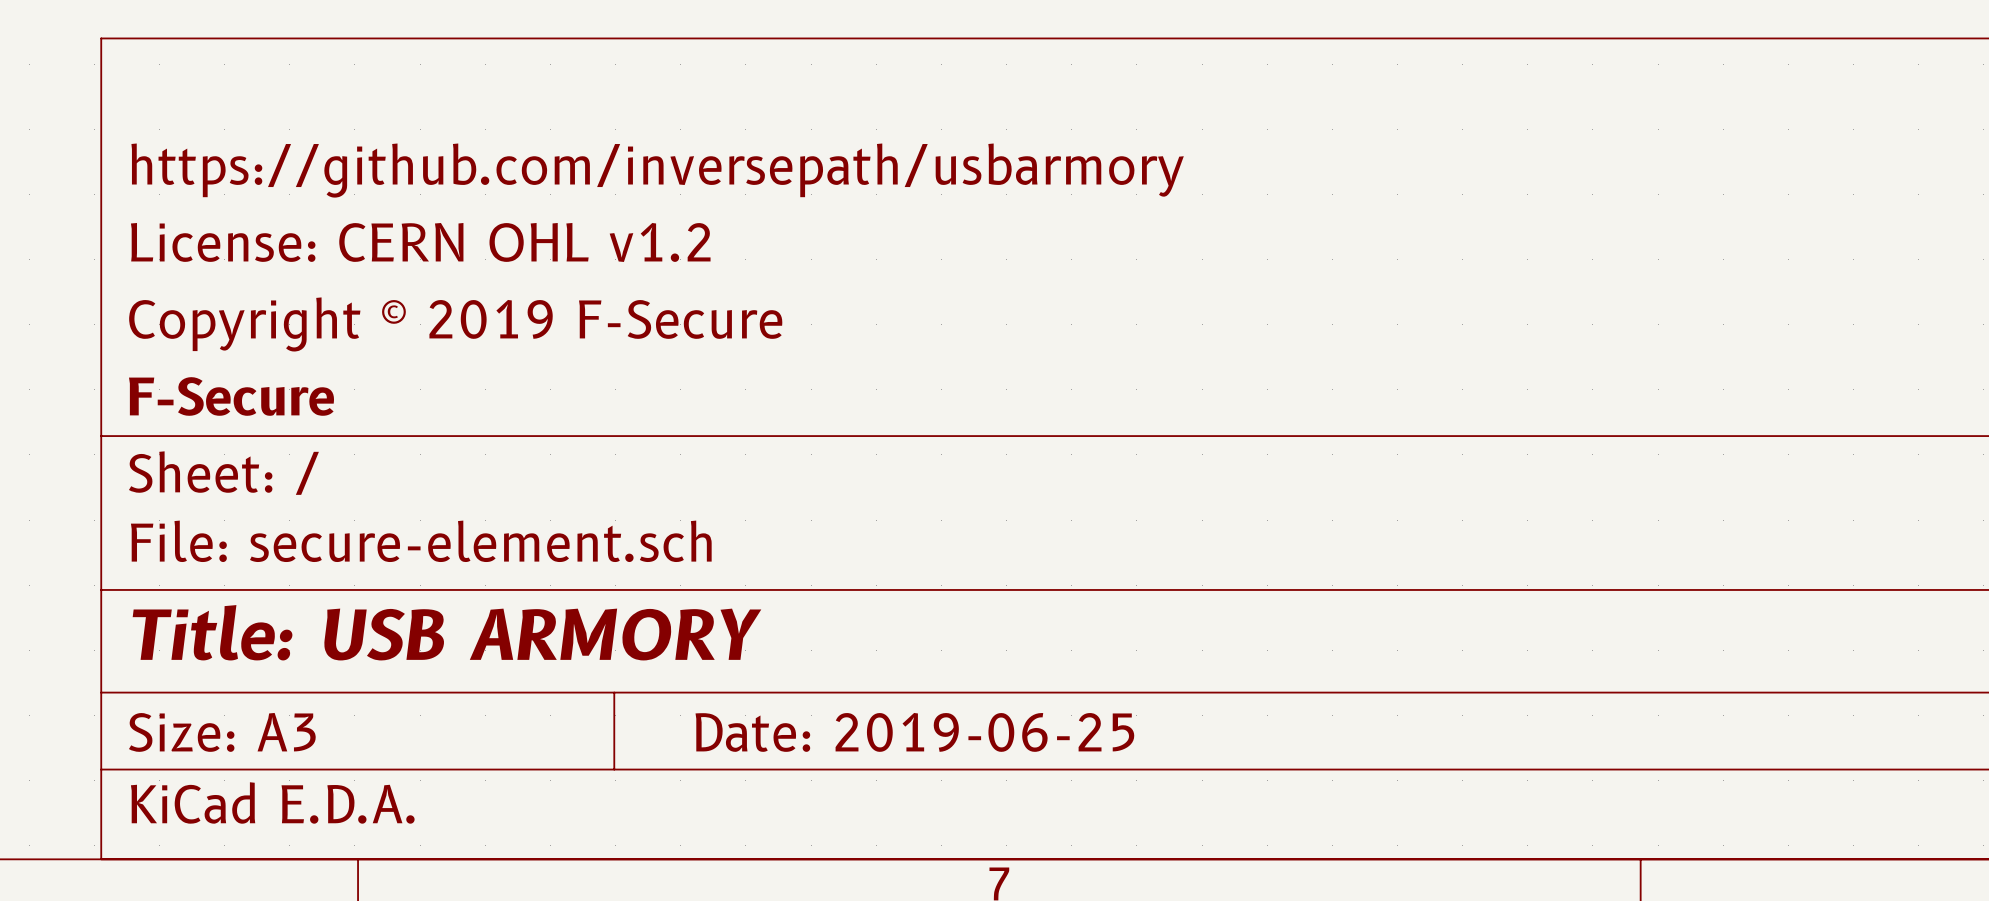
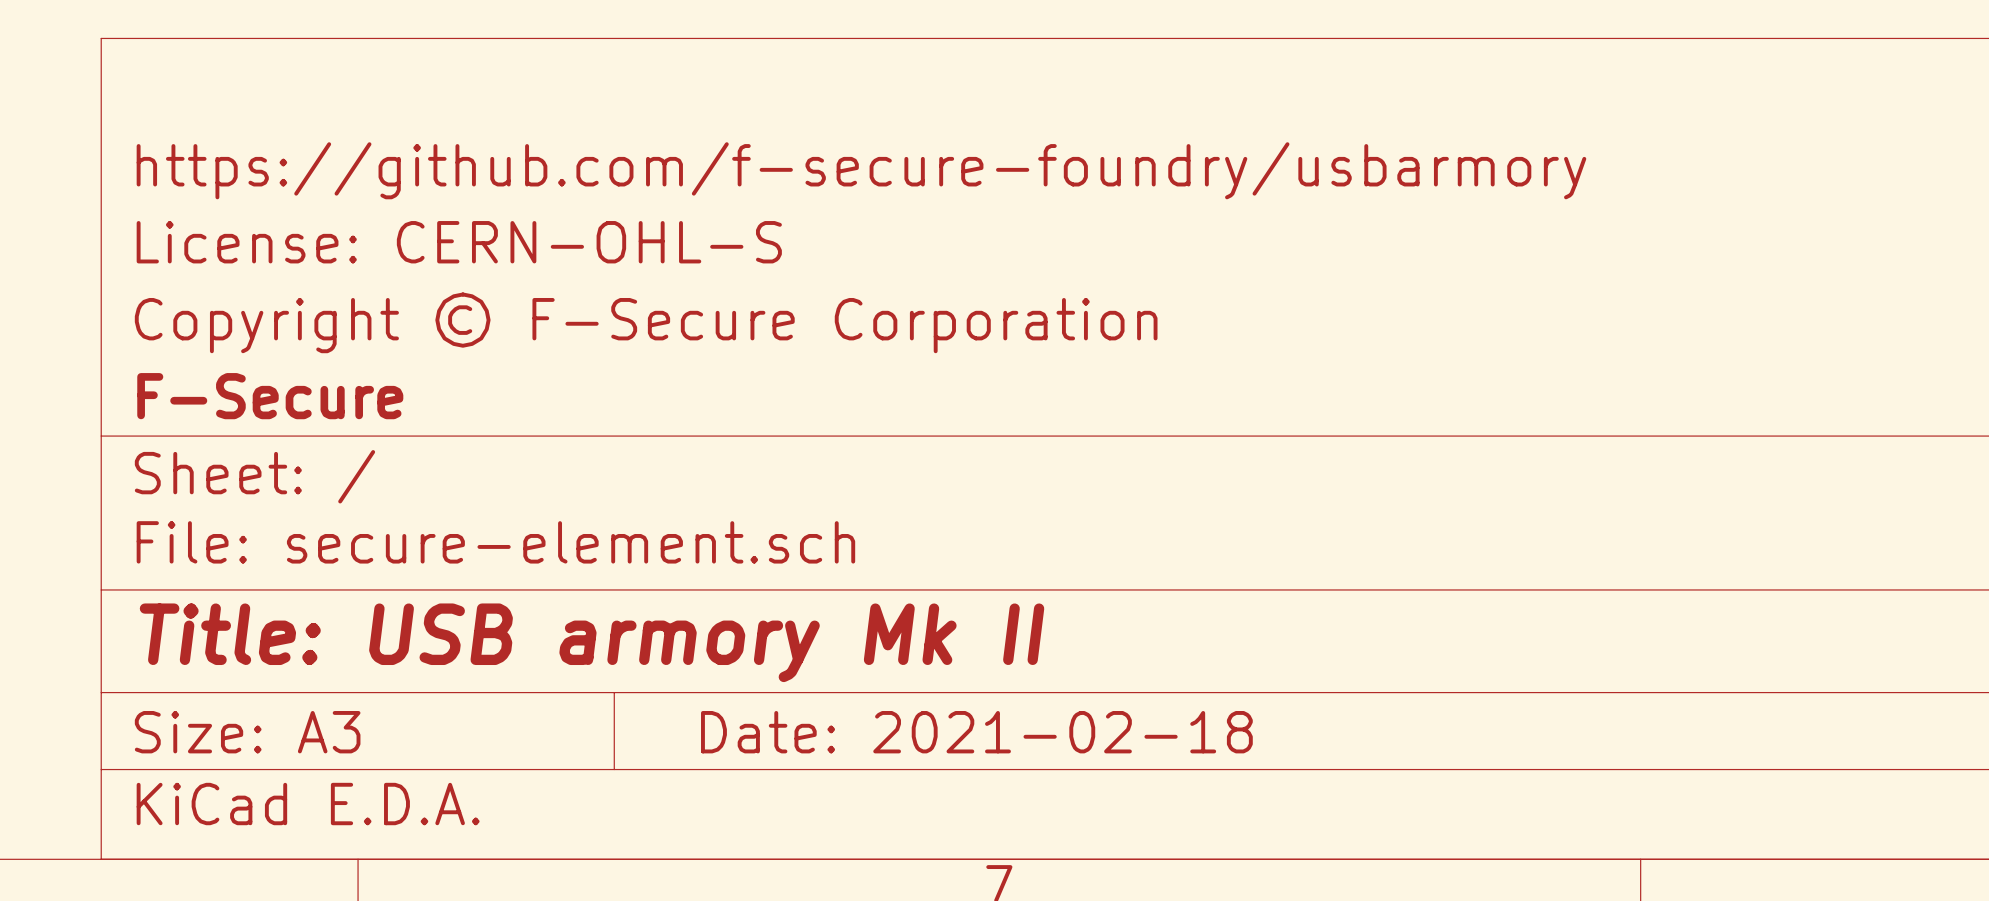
title block: https://github.com/inversepath/usbarmory (657, 170) -> https://github.com/f-secure-foundry/usbarmory (861, 170)
title block: License: CERN OHL v1.2 (420, 242) -> License: CERN-OHL-S (459, 242)
title block: Copyright © 2019 F-Secure (455, 324) -> Copyright © F-Secure Corporation (646, 322)
title block: Title: USB ARMORY (447, 632) -> Title: USB armory Mk II (592, 642)
title block: Date: 2019-06-25 (914, 732) -> Date: 2021-02-18 (976, 732)

